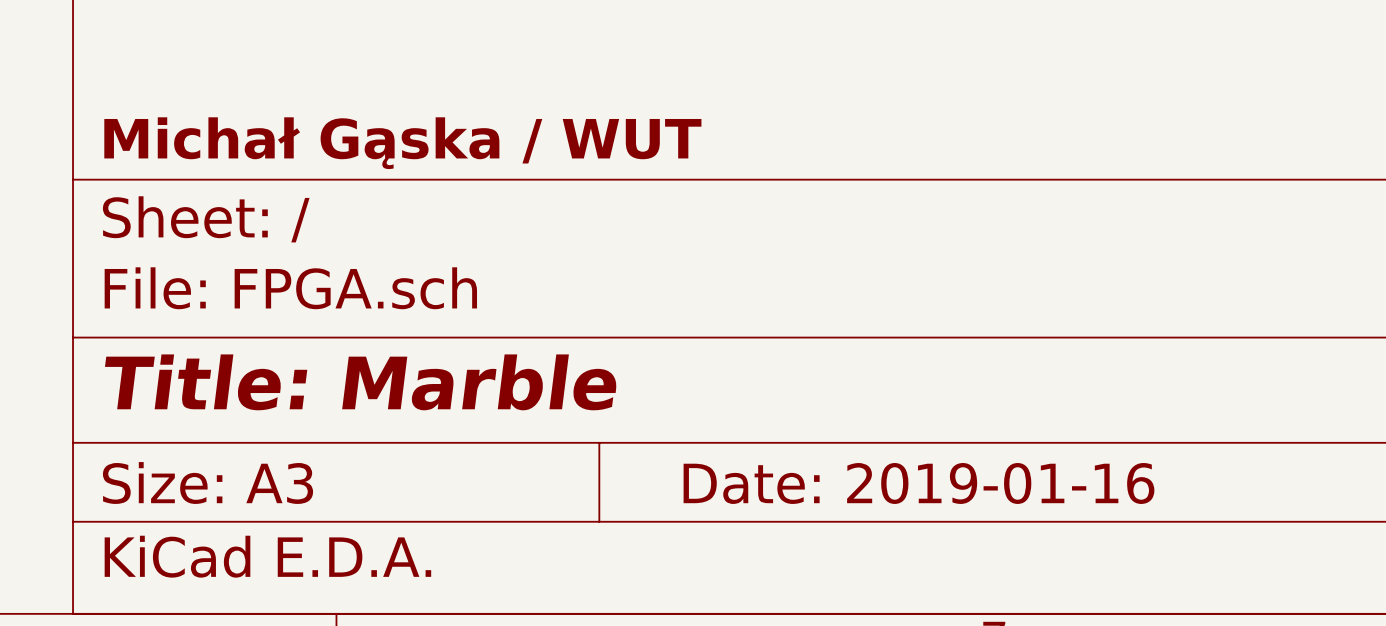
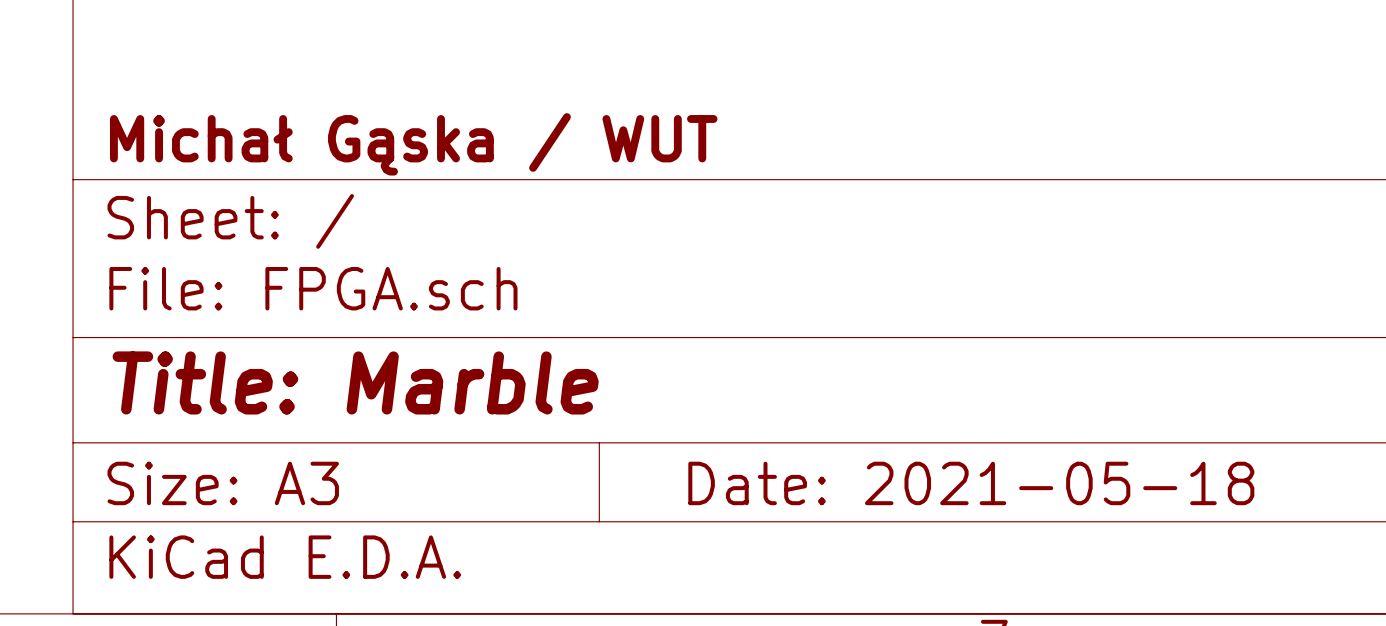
title block: Date: 2019-01-16 (918, 483) -> Date: 2021-05-18 (971, 483)

